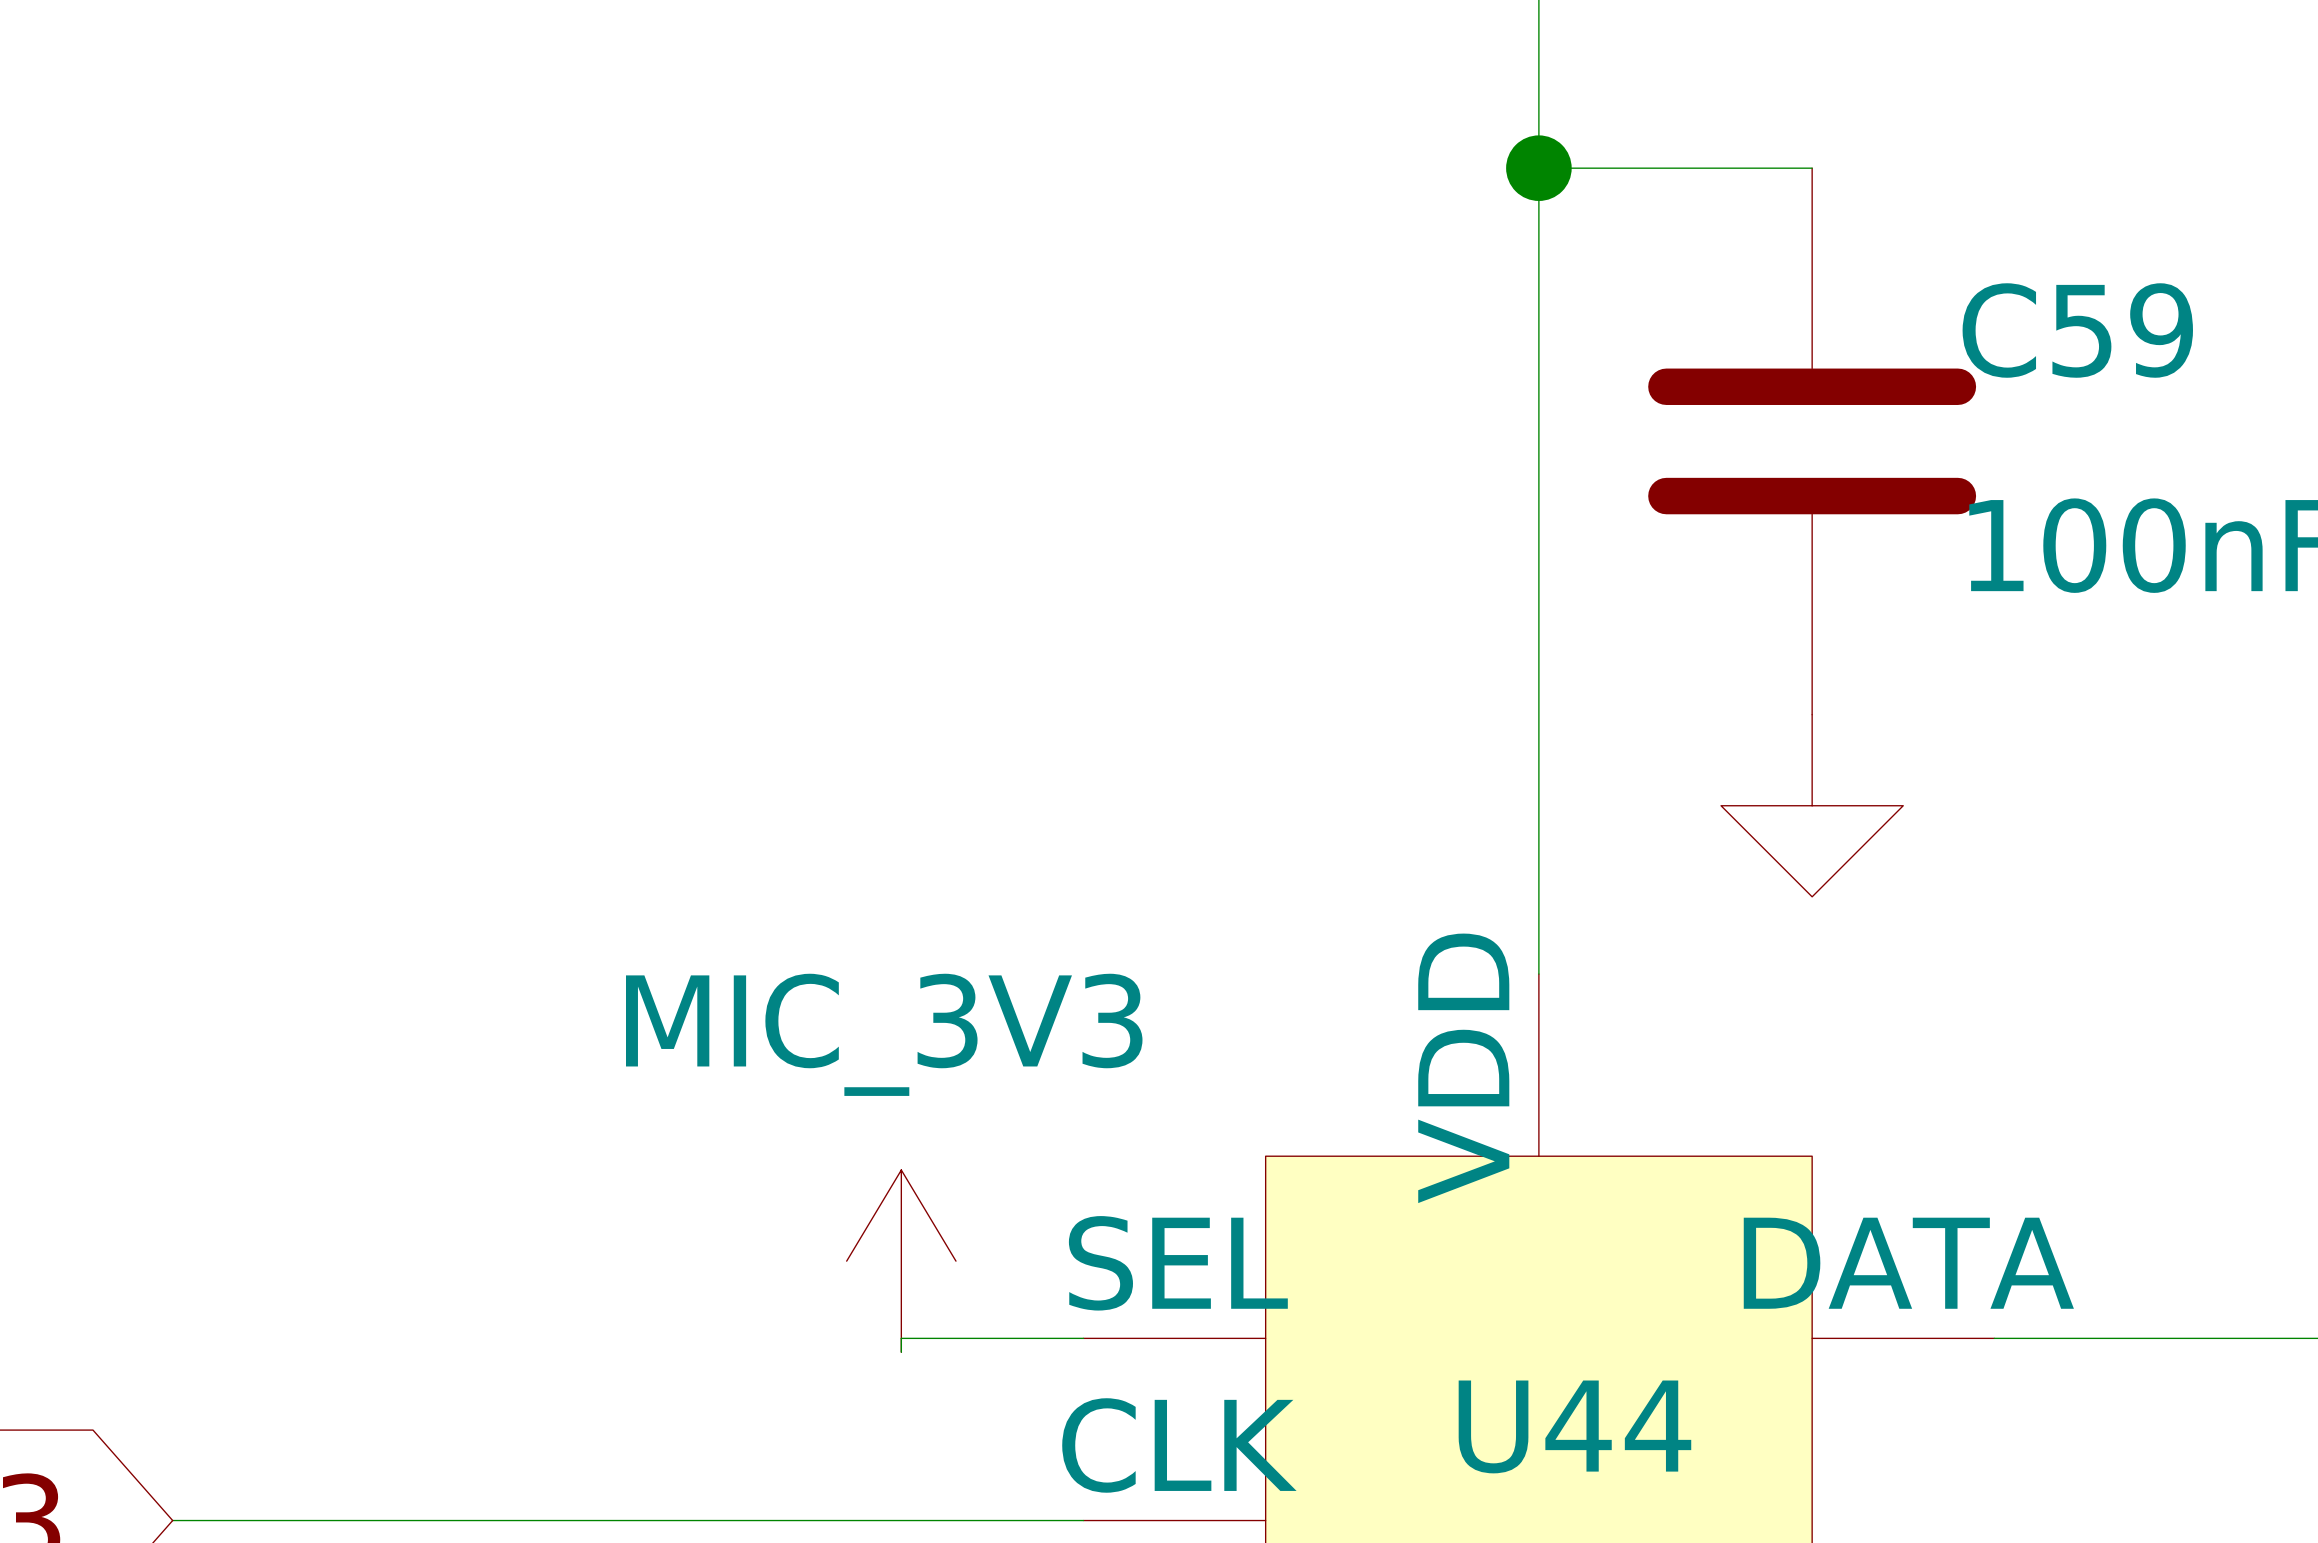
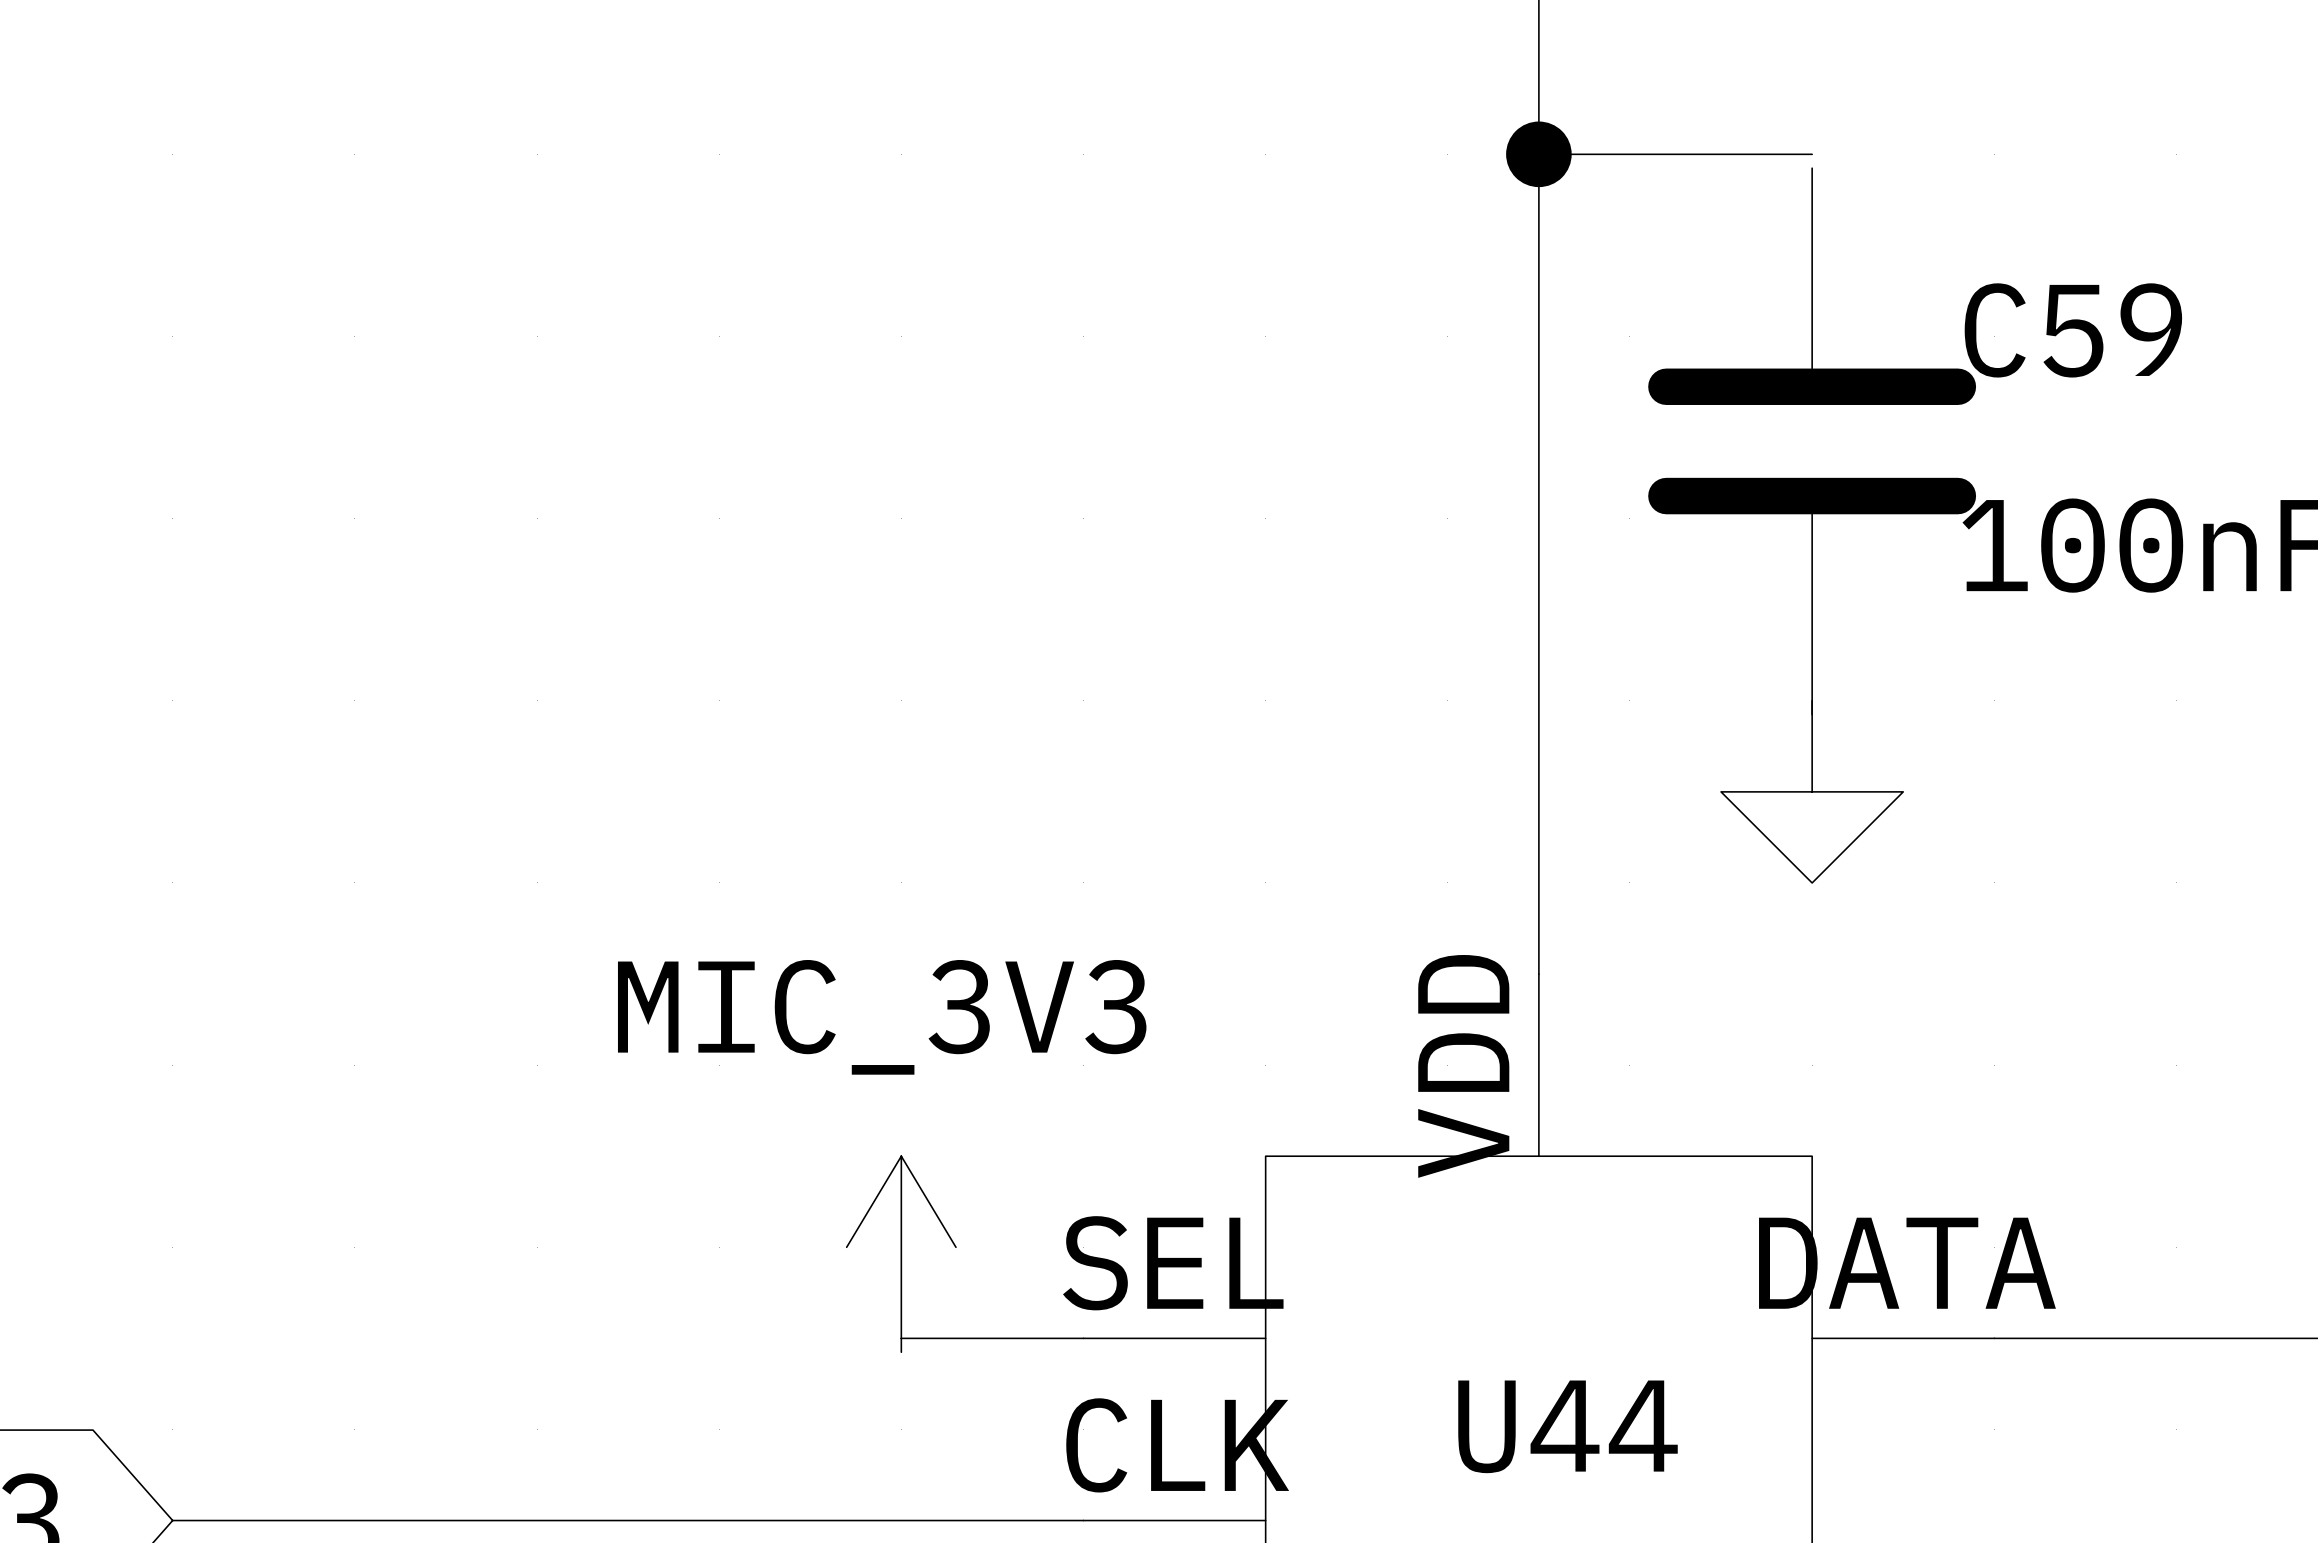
wire: (1538, 168) (1812, 168) -> (1538, 154) (1812, 154)
junction position: (1538, 168) -> (1538, 154)
power symbol position: (1812, 805) -> (1812, 791)
power symbol position: MIC_3V3 (901, 1261) -> MIC_3V3 (901, 1247)

